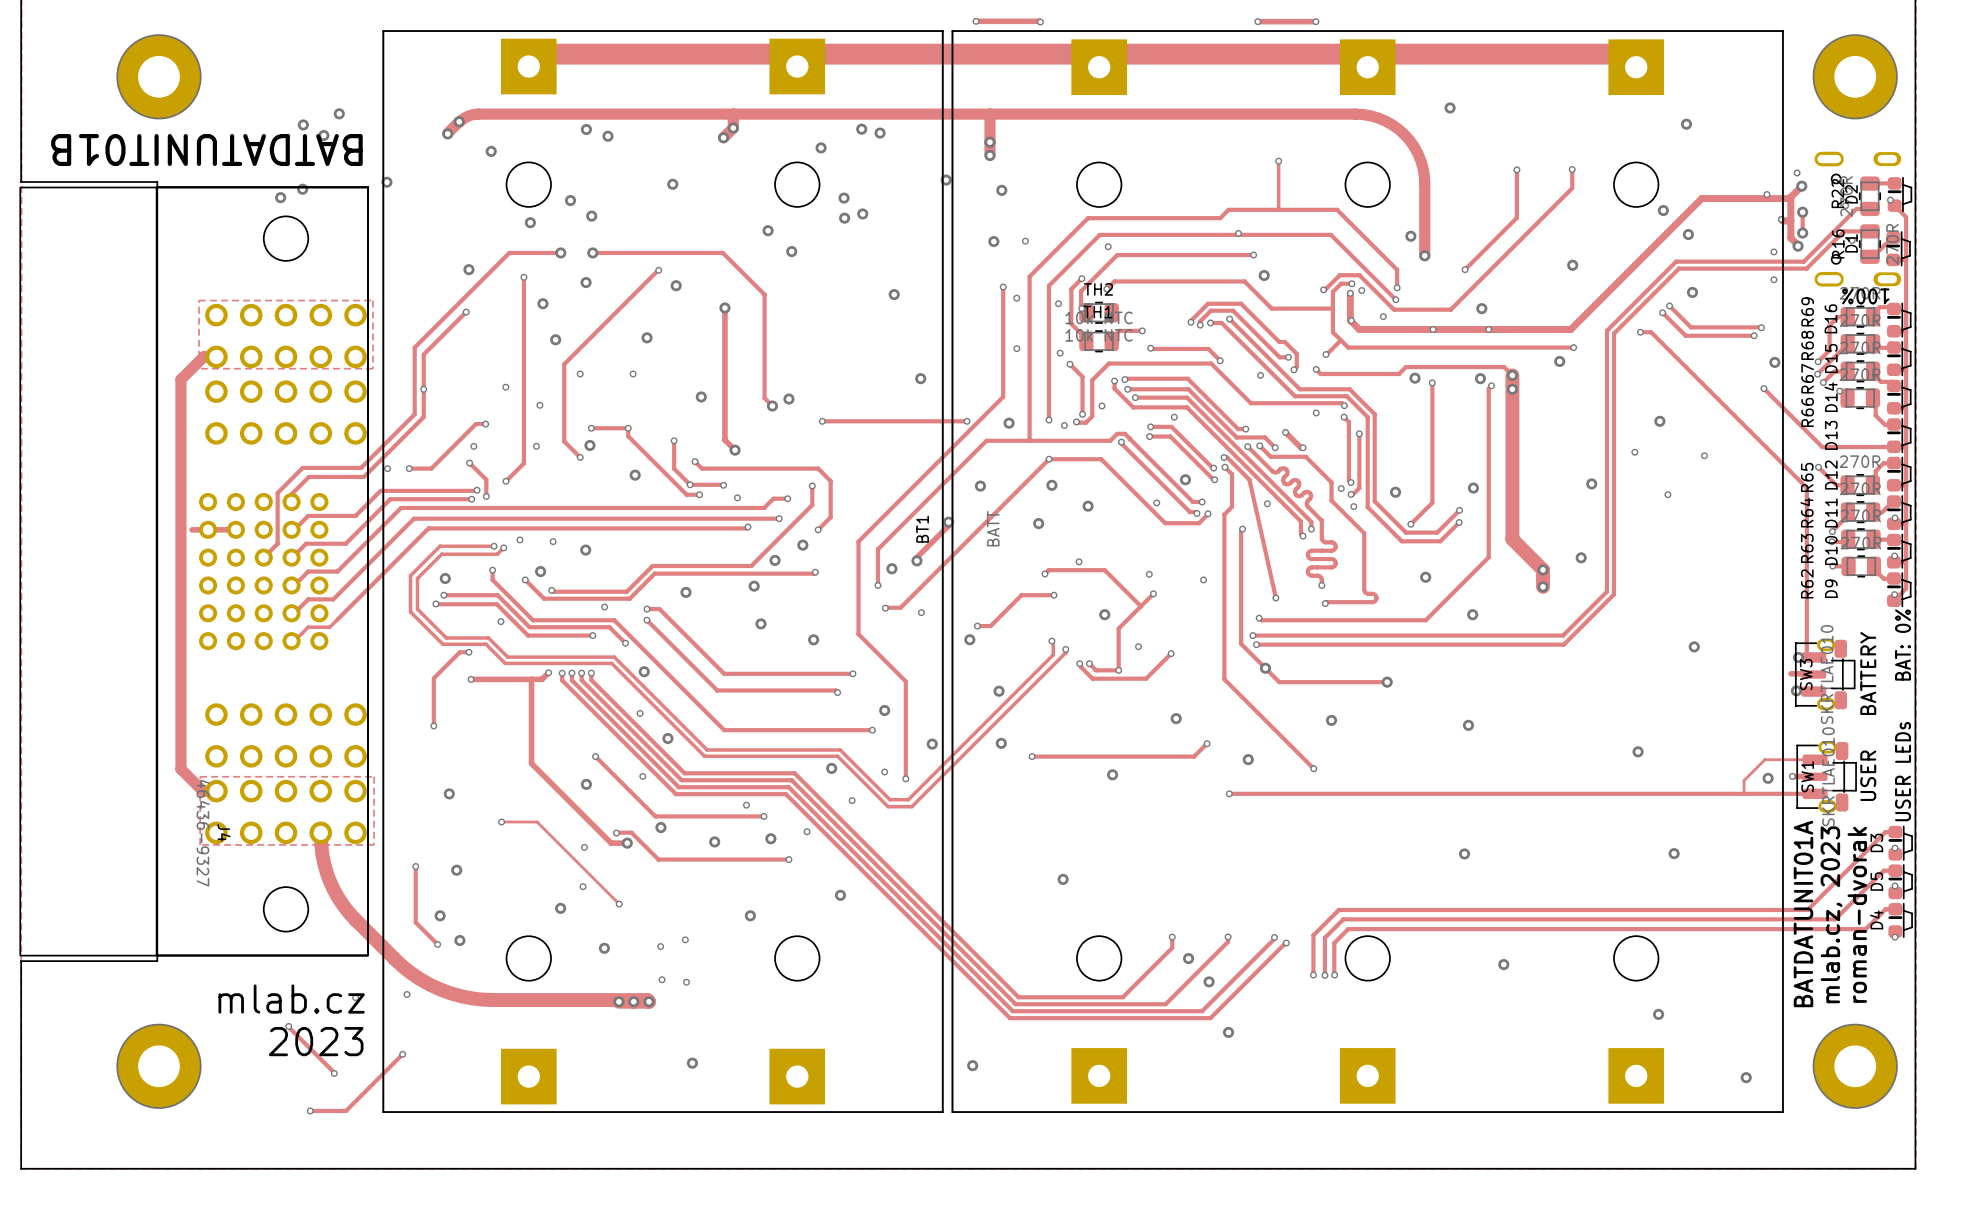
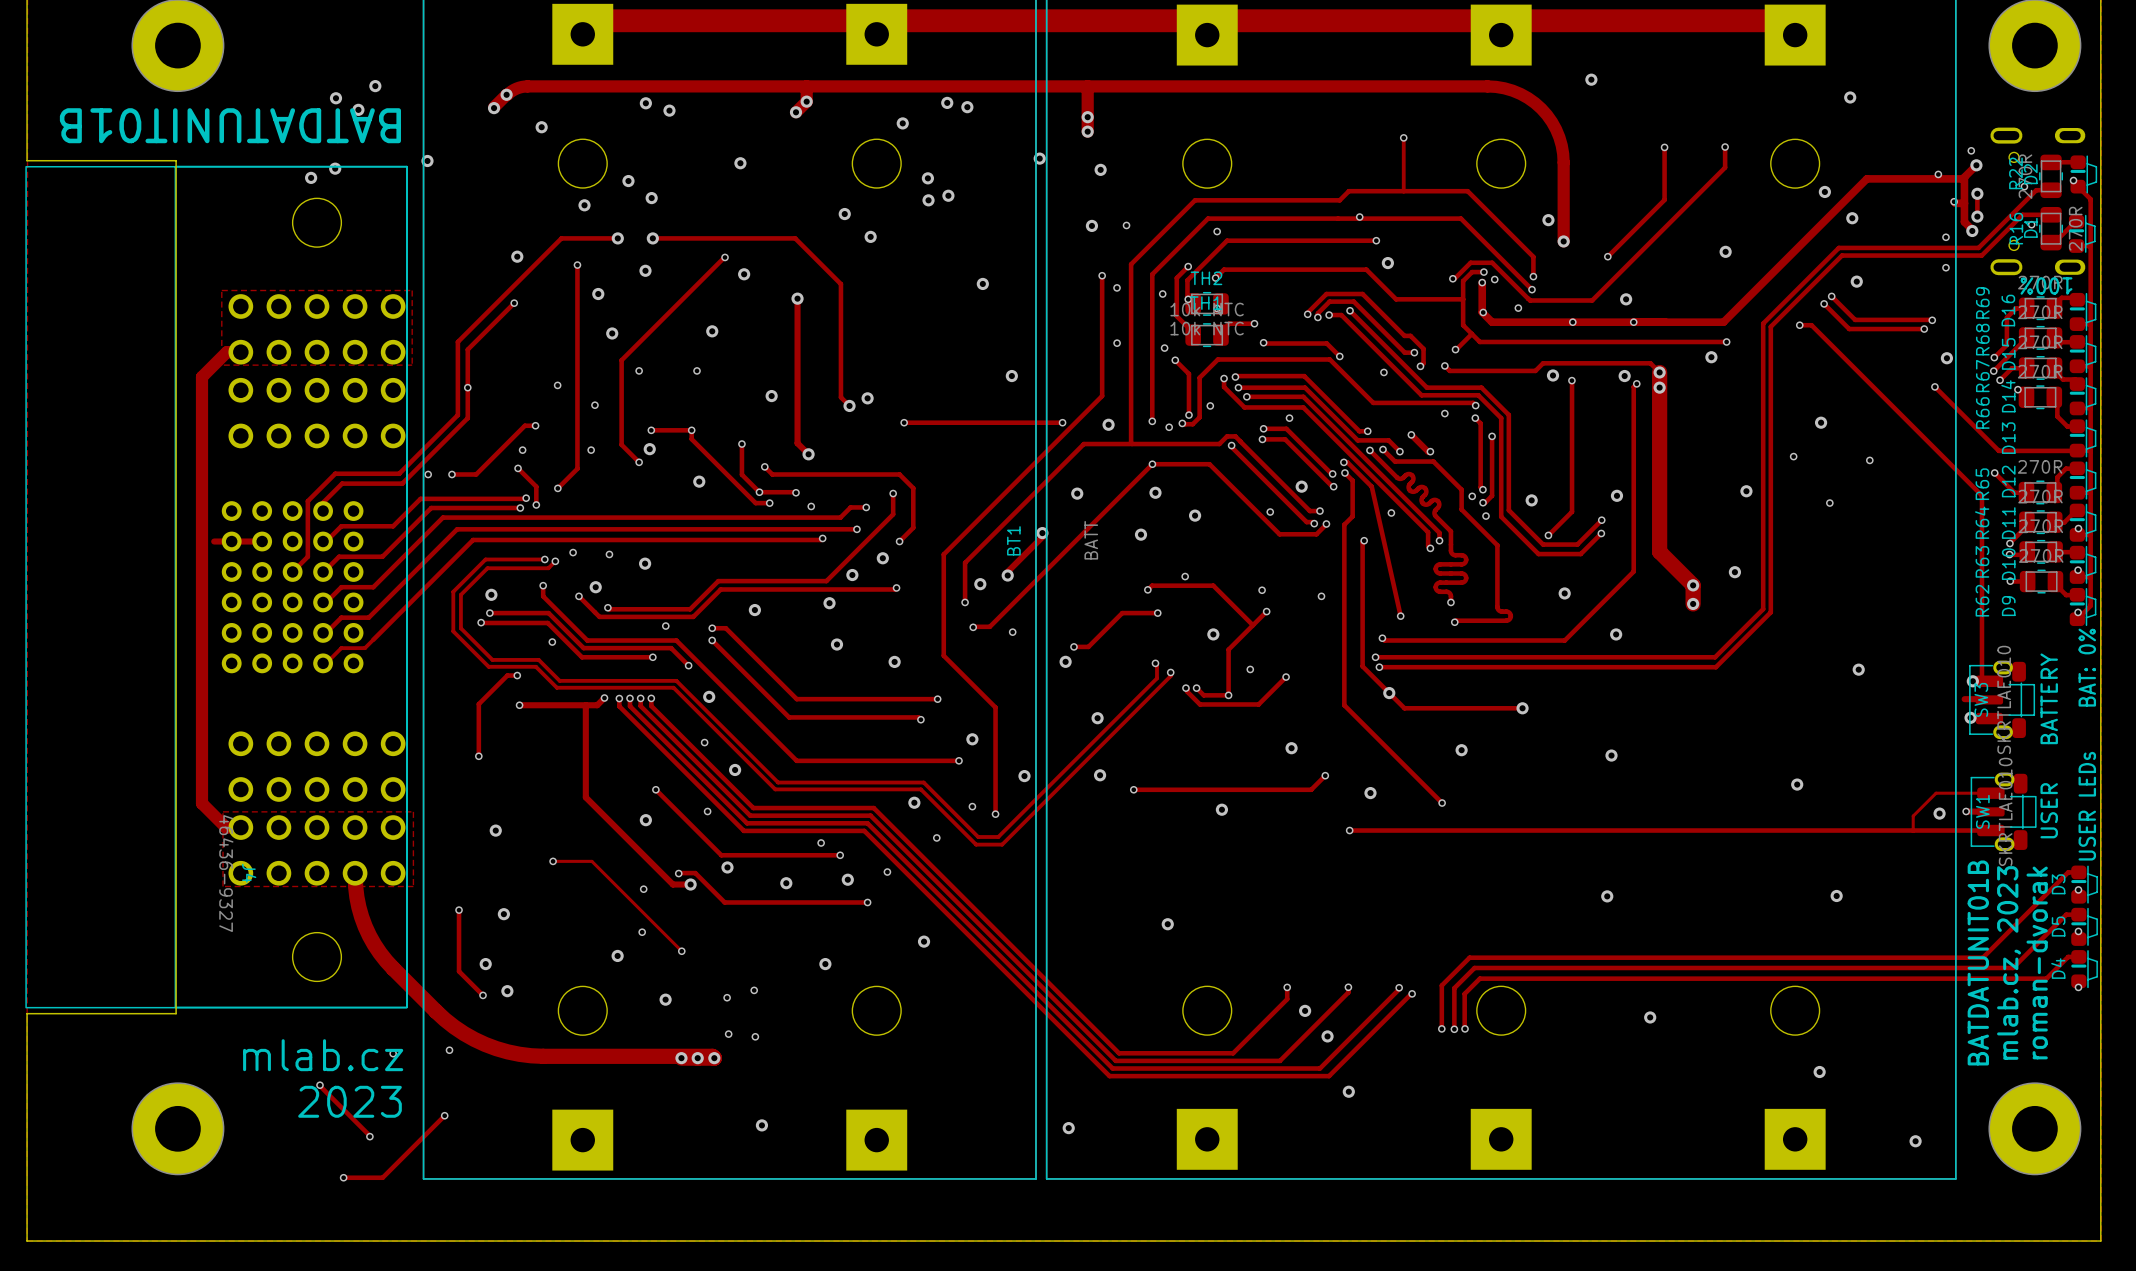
text: BATDATUNIT01A (1803, 914) -> BATDATUNIT01B (1978, 962)

